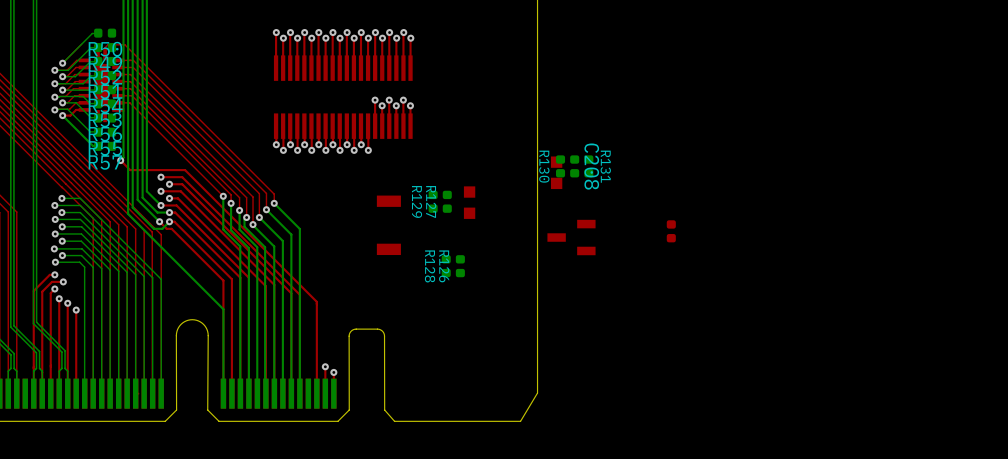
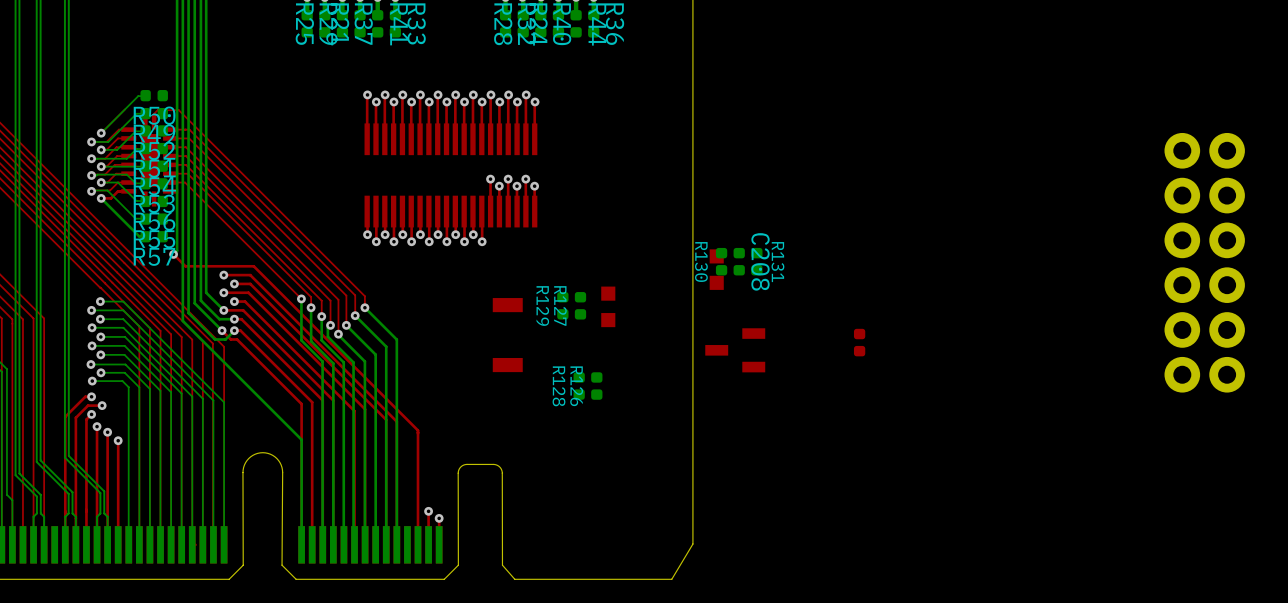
part: none -> (1204, 262)

